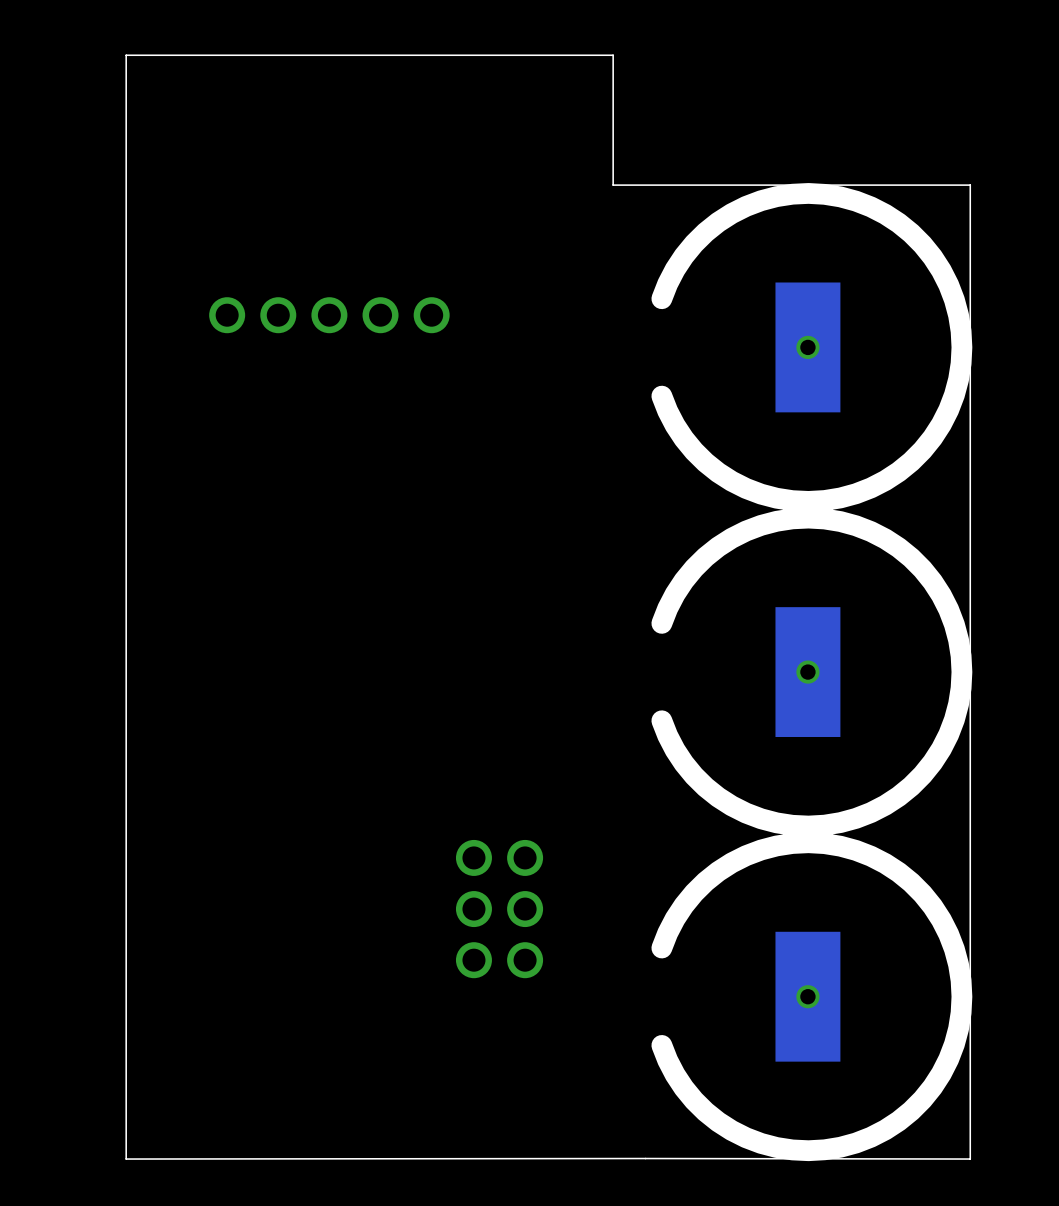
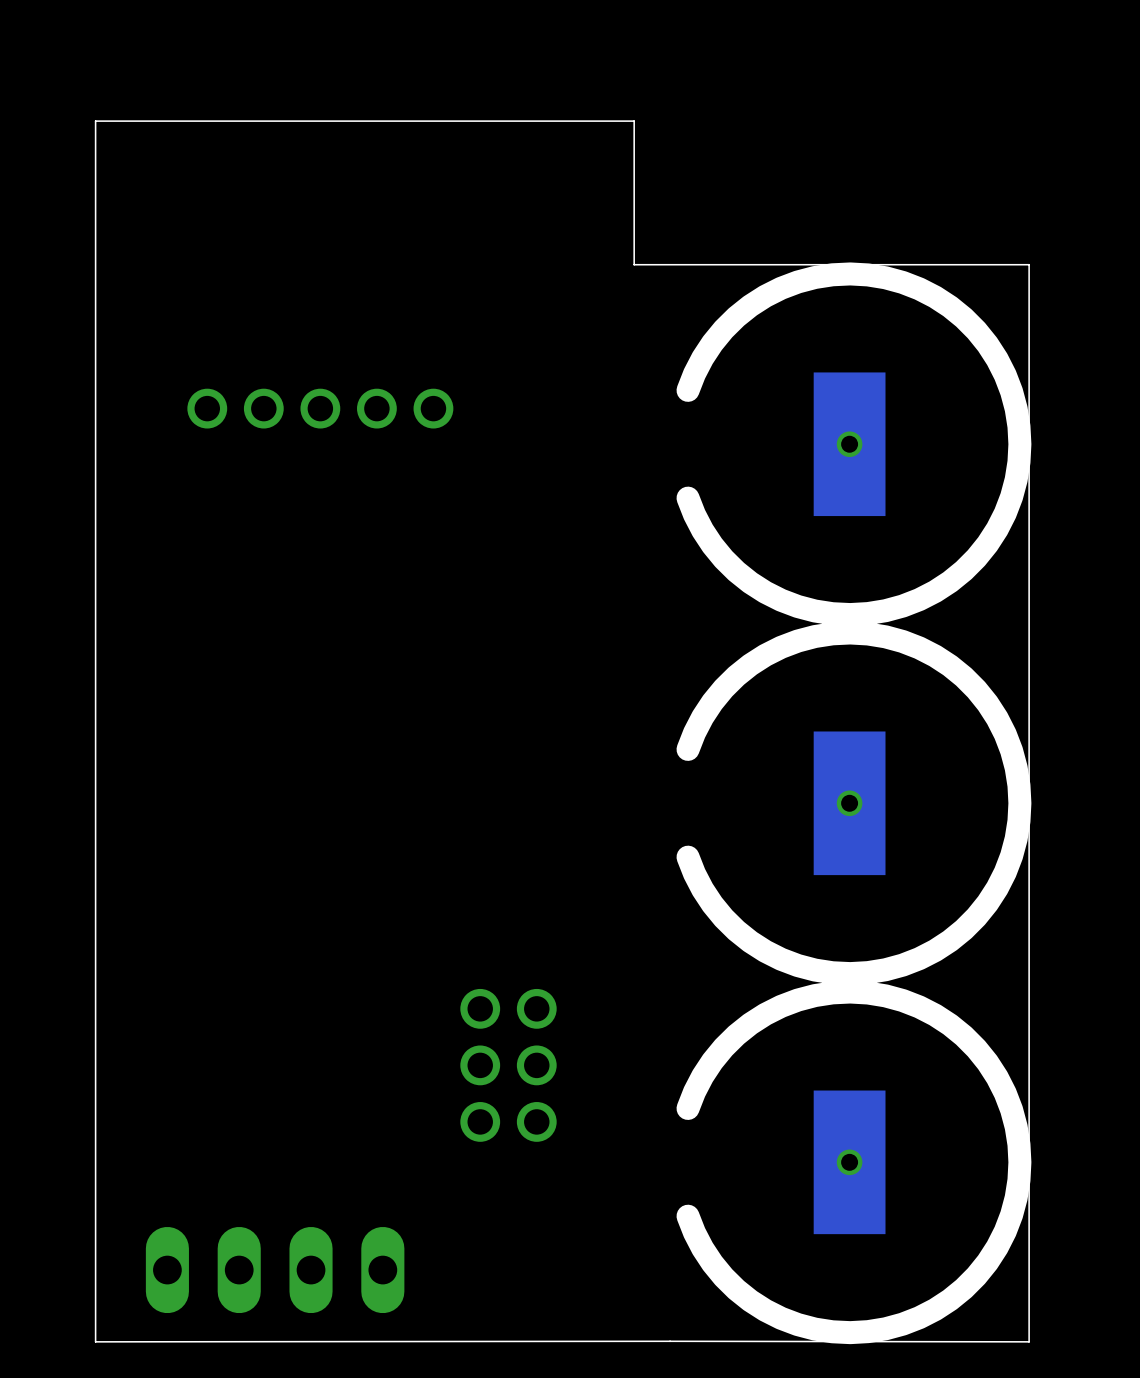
part: none -> (275, 1270)

